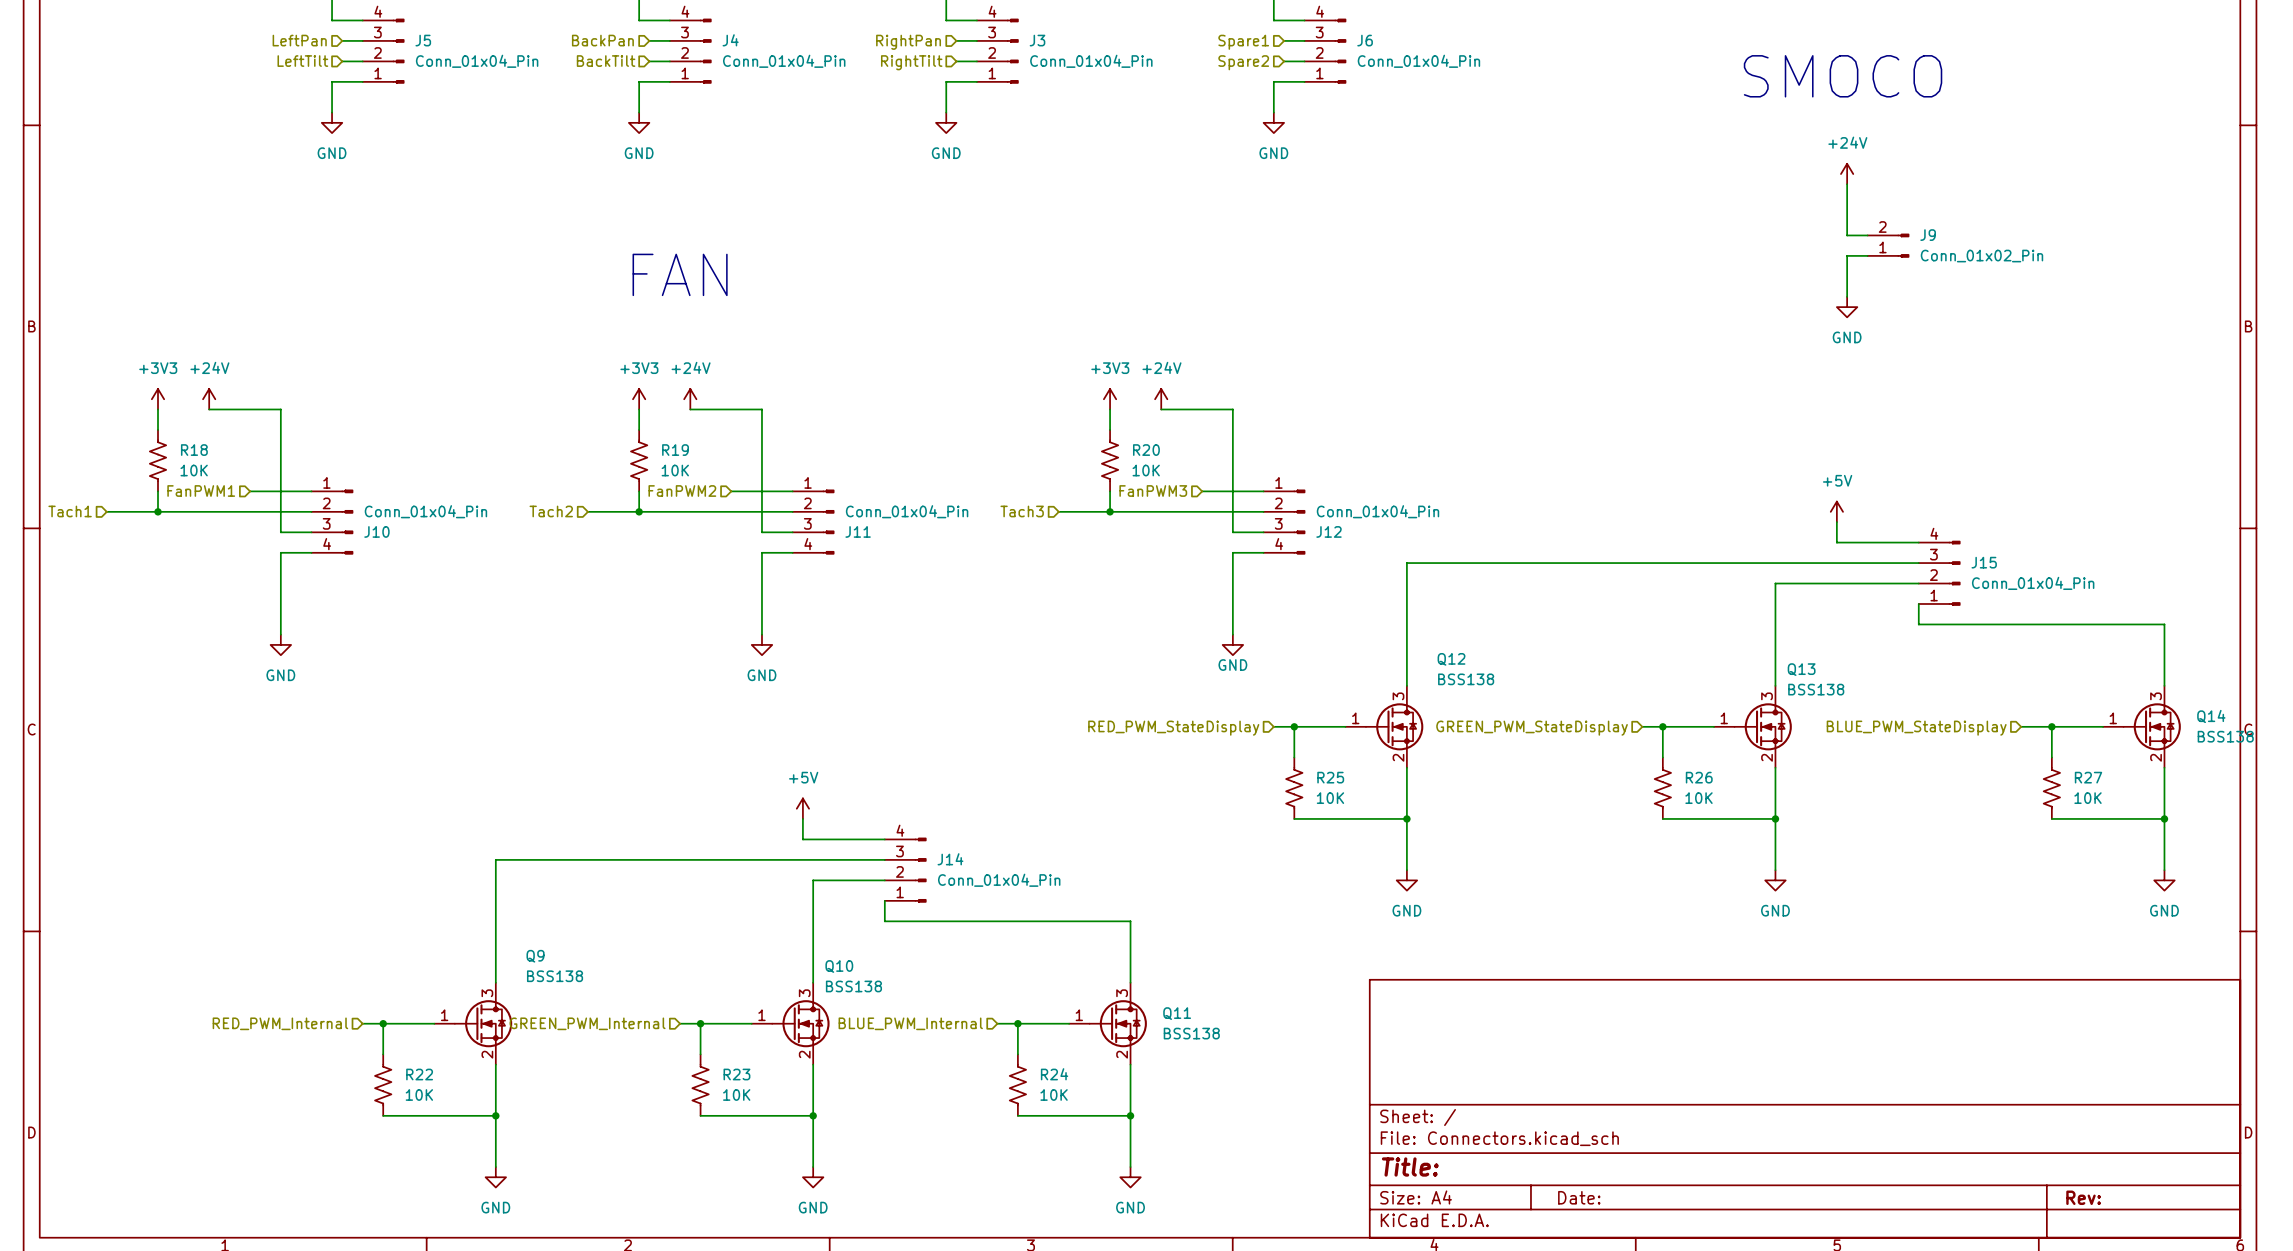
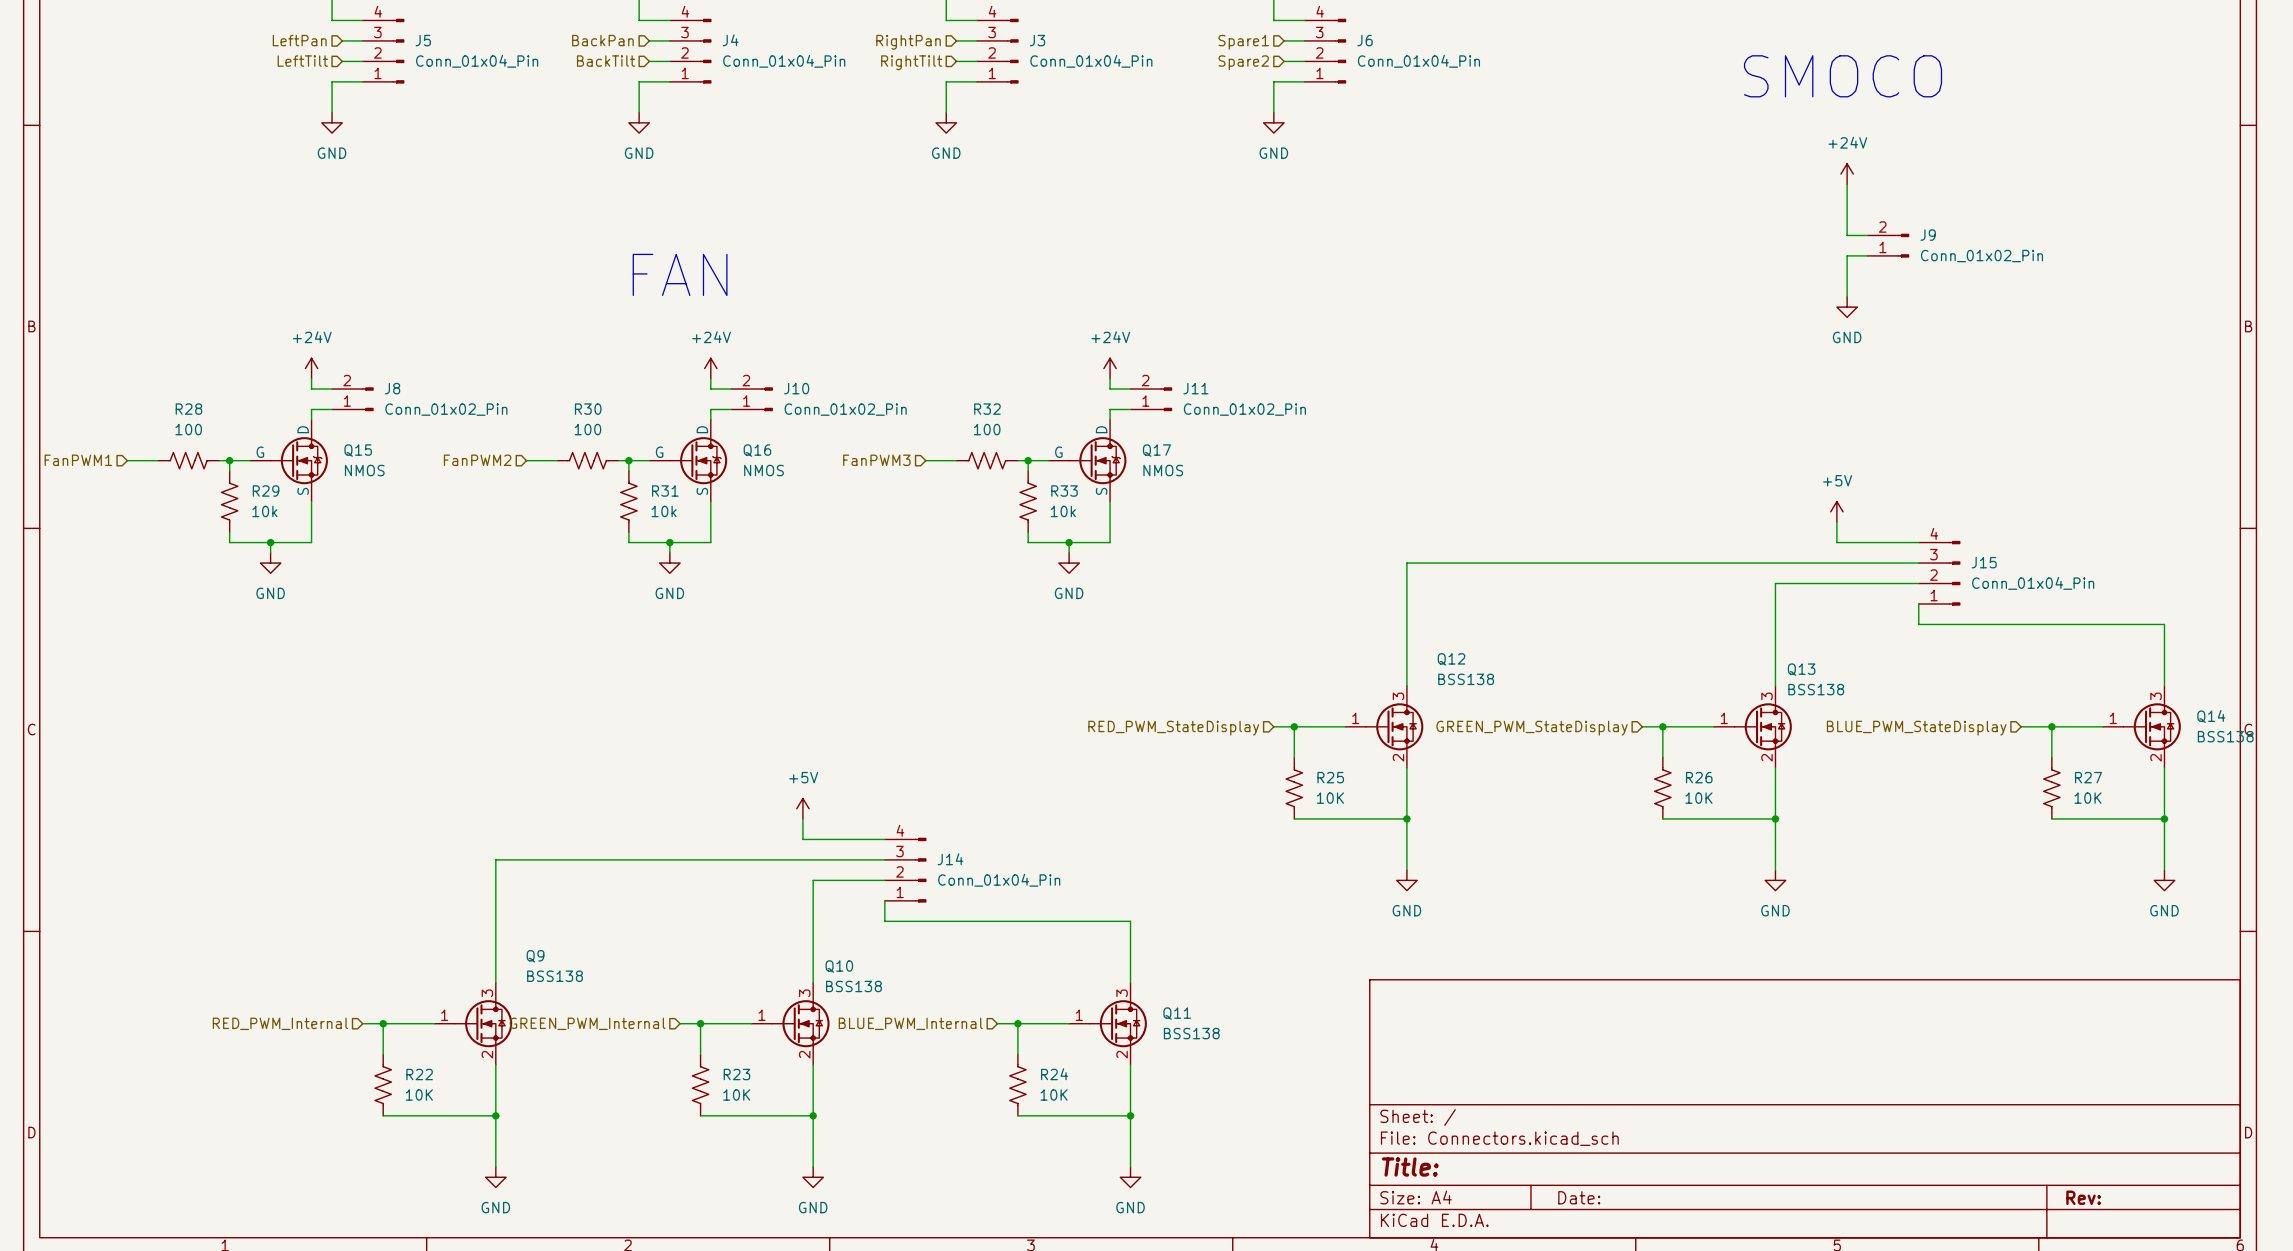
wire: none -> (311, 378) (311, 389) (332, 389)
wire: none -> (710, 378) (710, 389) (731, 389)
wire: none -> (1110, 378) (1110, 389) (1130, 389)
power symbol: +3V3 (157, 399) -> none
power symbol position: +24V (209, 399) -> +24V (311, 368)
J8: none -> Conn_01x02_Pin (352, 399)
power symbol: +3V3 (639, 399) -> none
power symbol position: +24V (690, 399) -> +24V (710, 368)
power symbol: +3V3 (1110, 399) -> none
power symbol position: +24V (1161, 399) -> +24V (1110, 368)
wire: (157, 409) (157, 429) -> none
wire: (209, 409) (280, 409) (280, 532) (311, 532) -> none
wire: none -> (332, 409) (311, 409) (311, 419)
wire: (639, 409) (639, 429) -> none
wire: (690, 409) (710, 409) -> (710, 419) (710, 409)
wire: (731, 409) (761, 409) (761, 532) (792, 532) -> none
wire: none -> (1110, 409) (1130, 409)
wire: (1161, 409) (1232, 409) (1232, 532) (1263, 532) -> none
wire: none -> (127, 460) (157, 460)
R18: 10K (157, 460) -> none
R28: none -> 100 (188, 460)
wire: none -> (219, 460) (250, 460)
wire: none -> (229, 460) (229, 470)
junction: none -> (229, 460)
Q15: none -> NMOS (289, 460)
hierarchical label: none -> FanPWM2 (477, 460)
wire: none -> (526, 460) (557, 460)
R30: none -> 100 (587, 460)
wire: none -> (618, 460) (649, 460)
wire: none -> (628, 460) (628, 470)
junction: none -> (628, 460)
R19: 10K (639, 460) -> none
Q16: none -> NMOS (688, 460)
hierarchical label: none -> FanPWM3 (876, 460)
wire: none -> (925, 460) (956, 460)
R32: none -> 100 (987, 460)
wire: none -> (1017, 460) (1048, 460)
junction: none -> (1028, 460)
Q17: none -> NMOS (1087, 460)
R20: 10K (1110, 460) -> none
J10 symbol: [311, 489, 354, 555] -> [731, 387, 773, 412]
J11 symbol: [792, 489, 835, 555] -> [1130, 387, 1173, 412]
wire: (157, 491) (157, 511) -> none
hierarchical label position: FanPWM1 (201, 491) -> FanPWM1 (78, 460)
wire: (250, 491) (311, 491) -> none
wire: (639, 491) (639, 511) -> none
hierarchical label: FanPWM2 (682, 491) -> none
wire: (731, 491) (792, 491) -> none
hierarchical label: FanPWM3 (1153, 491) -> none
wire: (1202, 491) (1263, 491) -> none
R29: none -> 10k (229, 501)
wire: none -> (311, 501) (311, 542) (229, 542) (229, 532)
R31: none -> 10k (628, 501)
wire: none -> (710, 501) (710, 542) (628, 542) (628, 532)
R33: none -> 10k (1028, 501)
hierarchical label: Tach1 (70, 511) -> none
wire: (106, 511) (311, 511) -> none
junction: (157, 511) -> none
J10 value: Conn_01x04_Pin (425, 511) -> Conn_01x02_Pin (845, 409)
hierarchical label: Tach2 (551, 511) -> none
wire: (587, 511) (792, 511) -> none
junction: (639, 511) -> none
J11 value: Conn_01x04_Pin (907, 511) -> Conn_01x02_Pin (1244, 409)
hierarchical label: Tach3 (1022, 511) -> none
wire: (1058, 511) (1263, 511) -> none
wire: none -> (1110, 511) (1110, 542) (1028, 542) (1028, 532)
junction: (1110, 511) -> none
J12: Conn_01x04_Pin (1284, 522) -> none
J10 name position: J10 (376, 531) -> J10 (796, 388)
J11 name position: J11 (858, 531) -> J11 (1195, 388)
wire: none -> (270, 542) (270, 552)
junction: none -> (270, 542)
wire: none -> (669, 542) (669, 552)
junction: none -> (669, 542)
junction: none -> (1069, 542)
wire: (311, 552) (280, 552) (280, 634) -> none
wire: (792, 552) (761, 552) (761, 634) -> none
wire: (1263, 552) (1232, 552) (1232, 634) -> none
power symbol: none -> GND (1069, 563)
power symbol position: GND (280, 644) -> GND (270, 563)
power symbol position: GND (761, 644) -> GND (669, 563)
power symbol: GND (1232, 644) -> none

